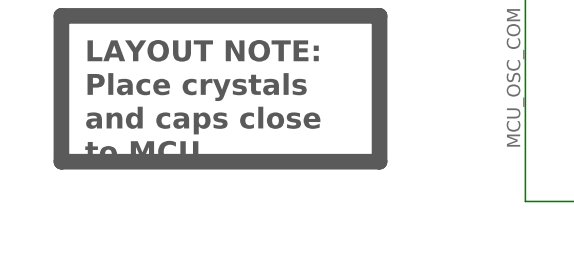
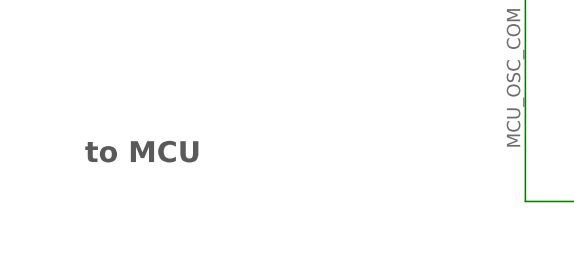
line: (61, 15) (379, 15) (379, 161) (61, 161) (61, 15) -> none
text: LAYOUT NOTE: (203, 50) -> none
text: Place crystals (197, 87) -> none
text: and caps close (203, 120) -> none

